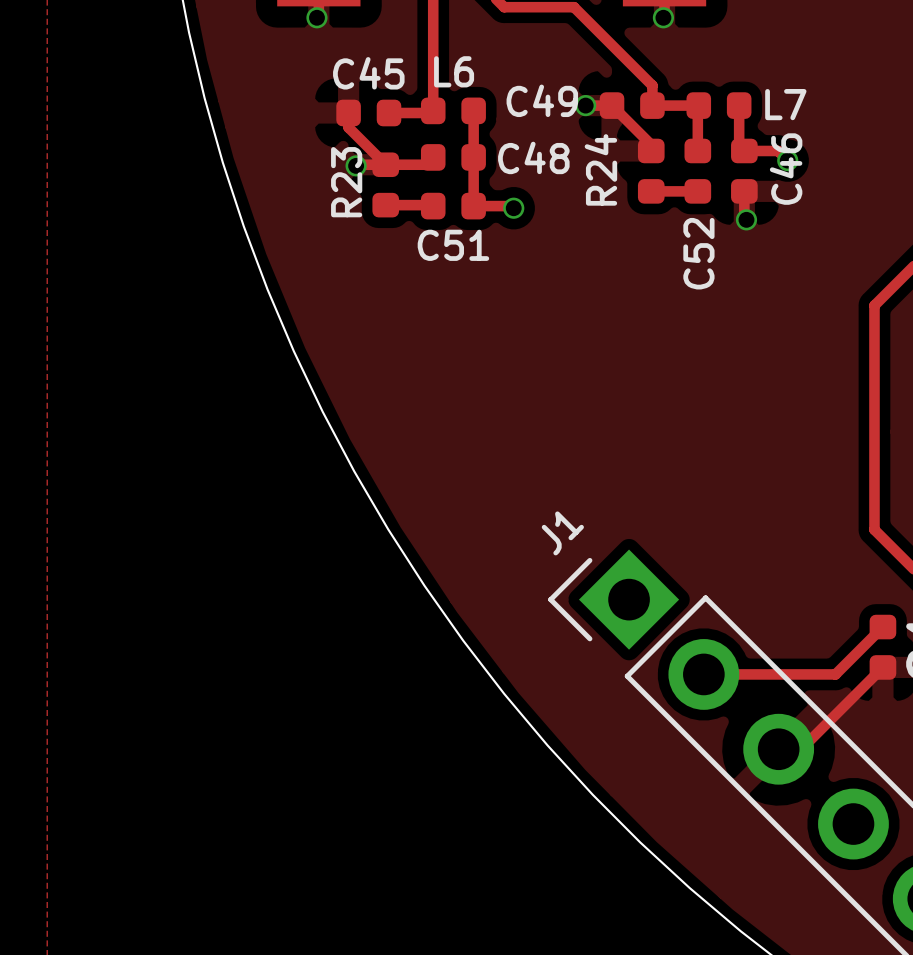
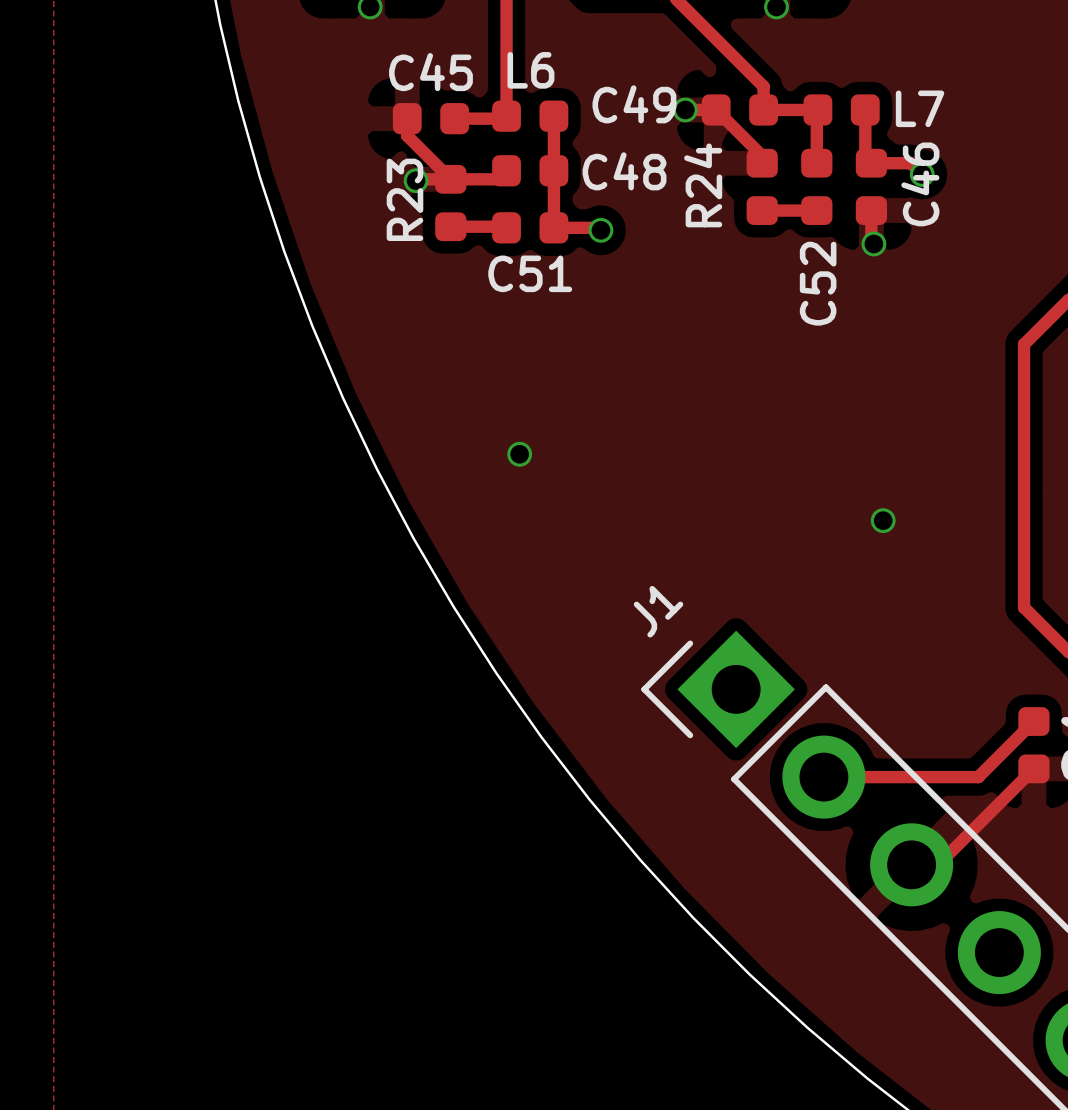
via: none -> (519, 454)
via: none -> (883, 520)

